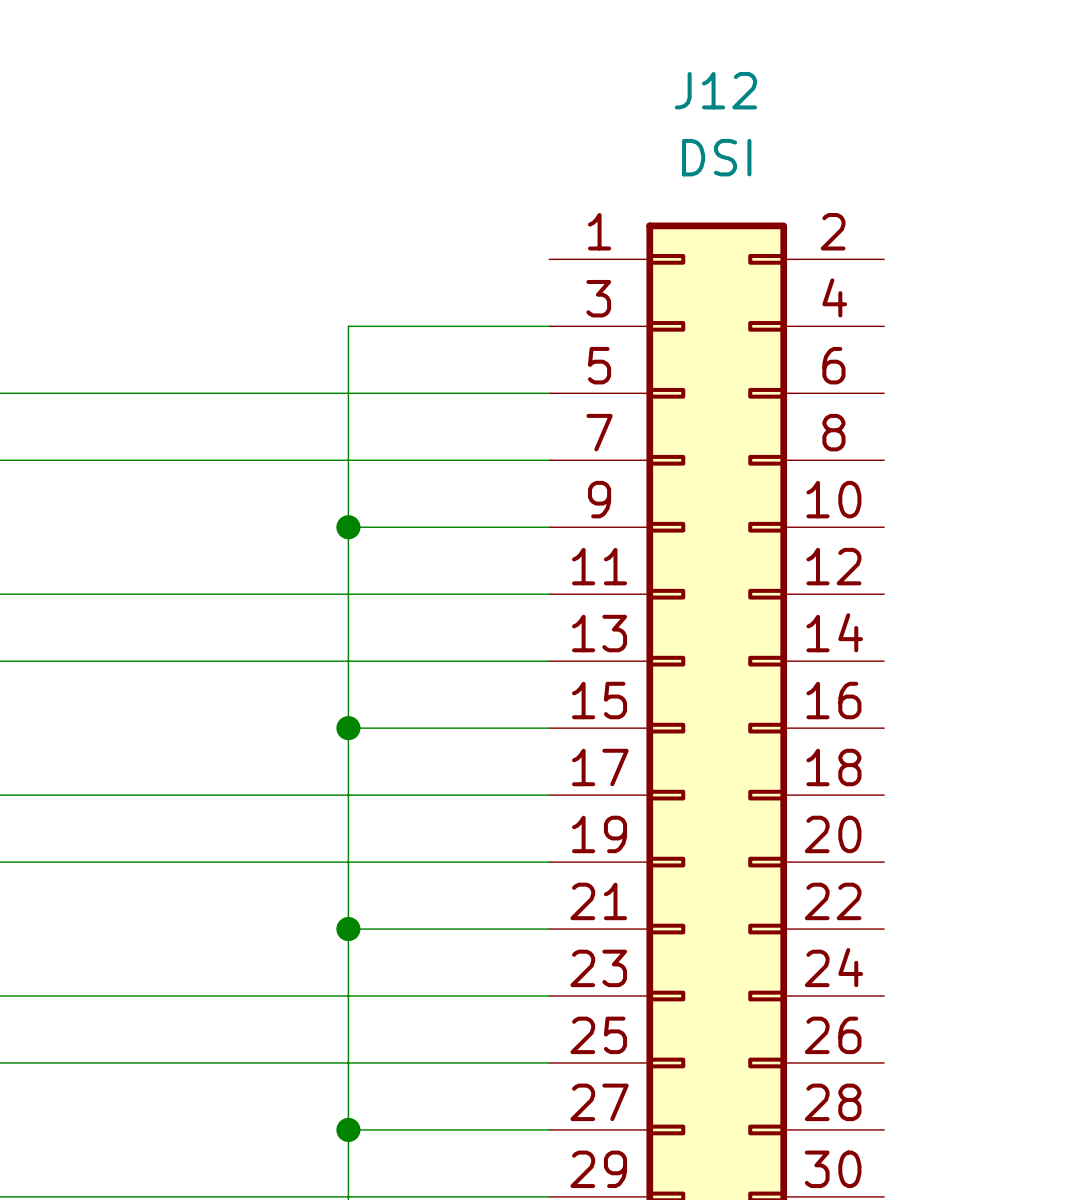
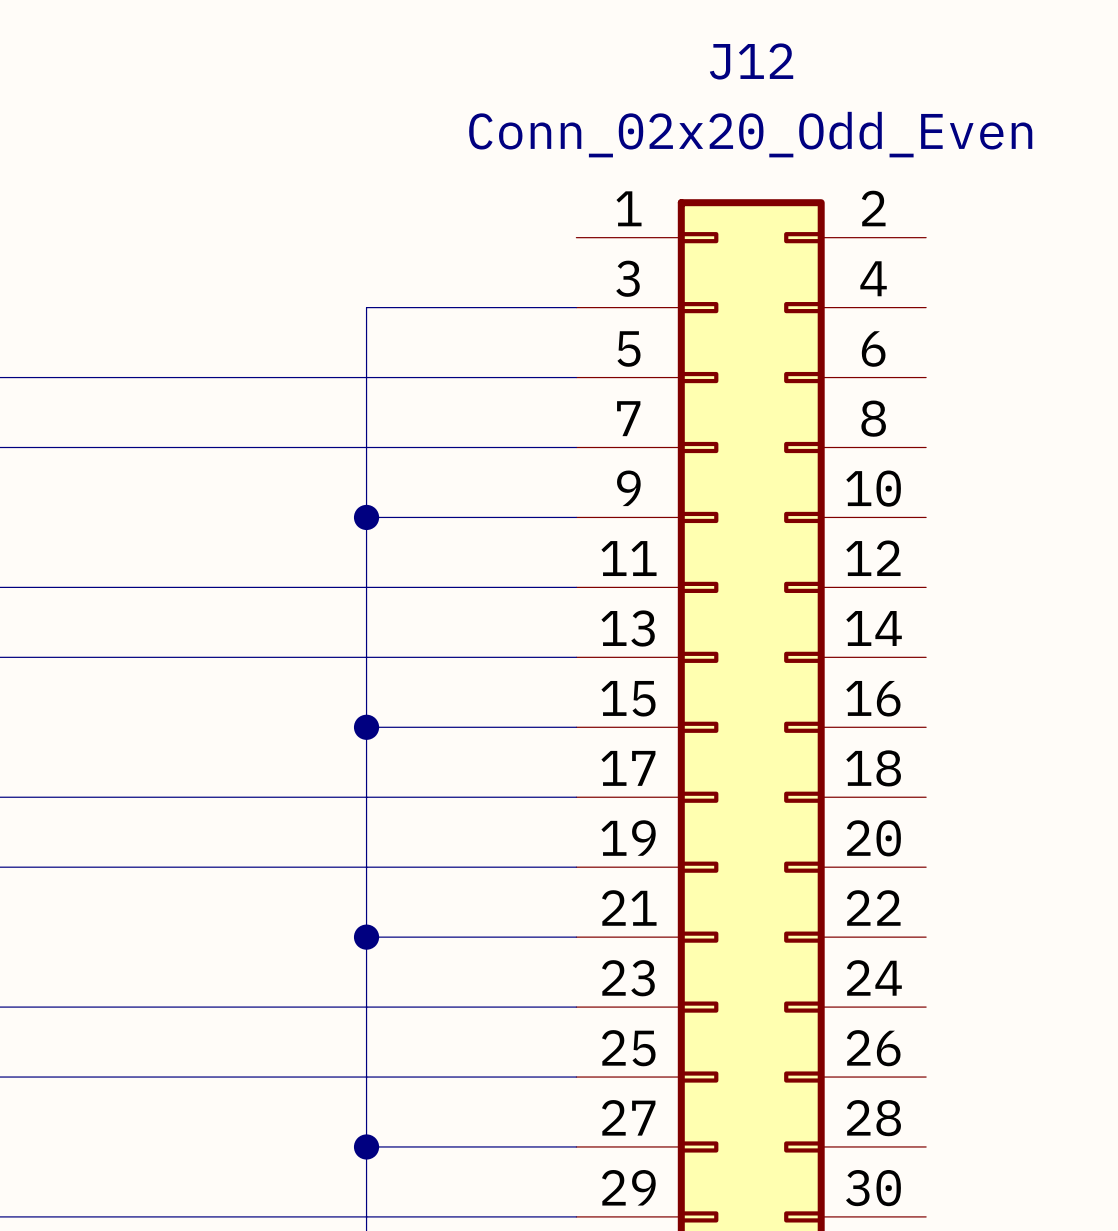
J12 value: DSI (716, 157) -> Conn_02x20_Odd_Even (750, 134)

